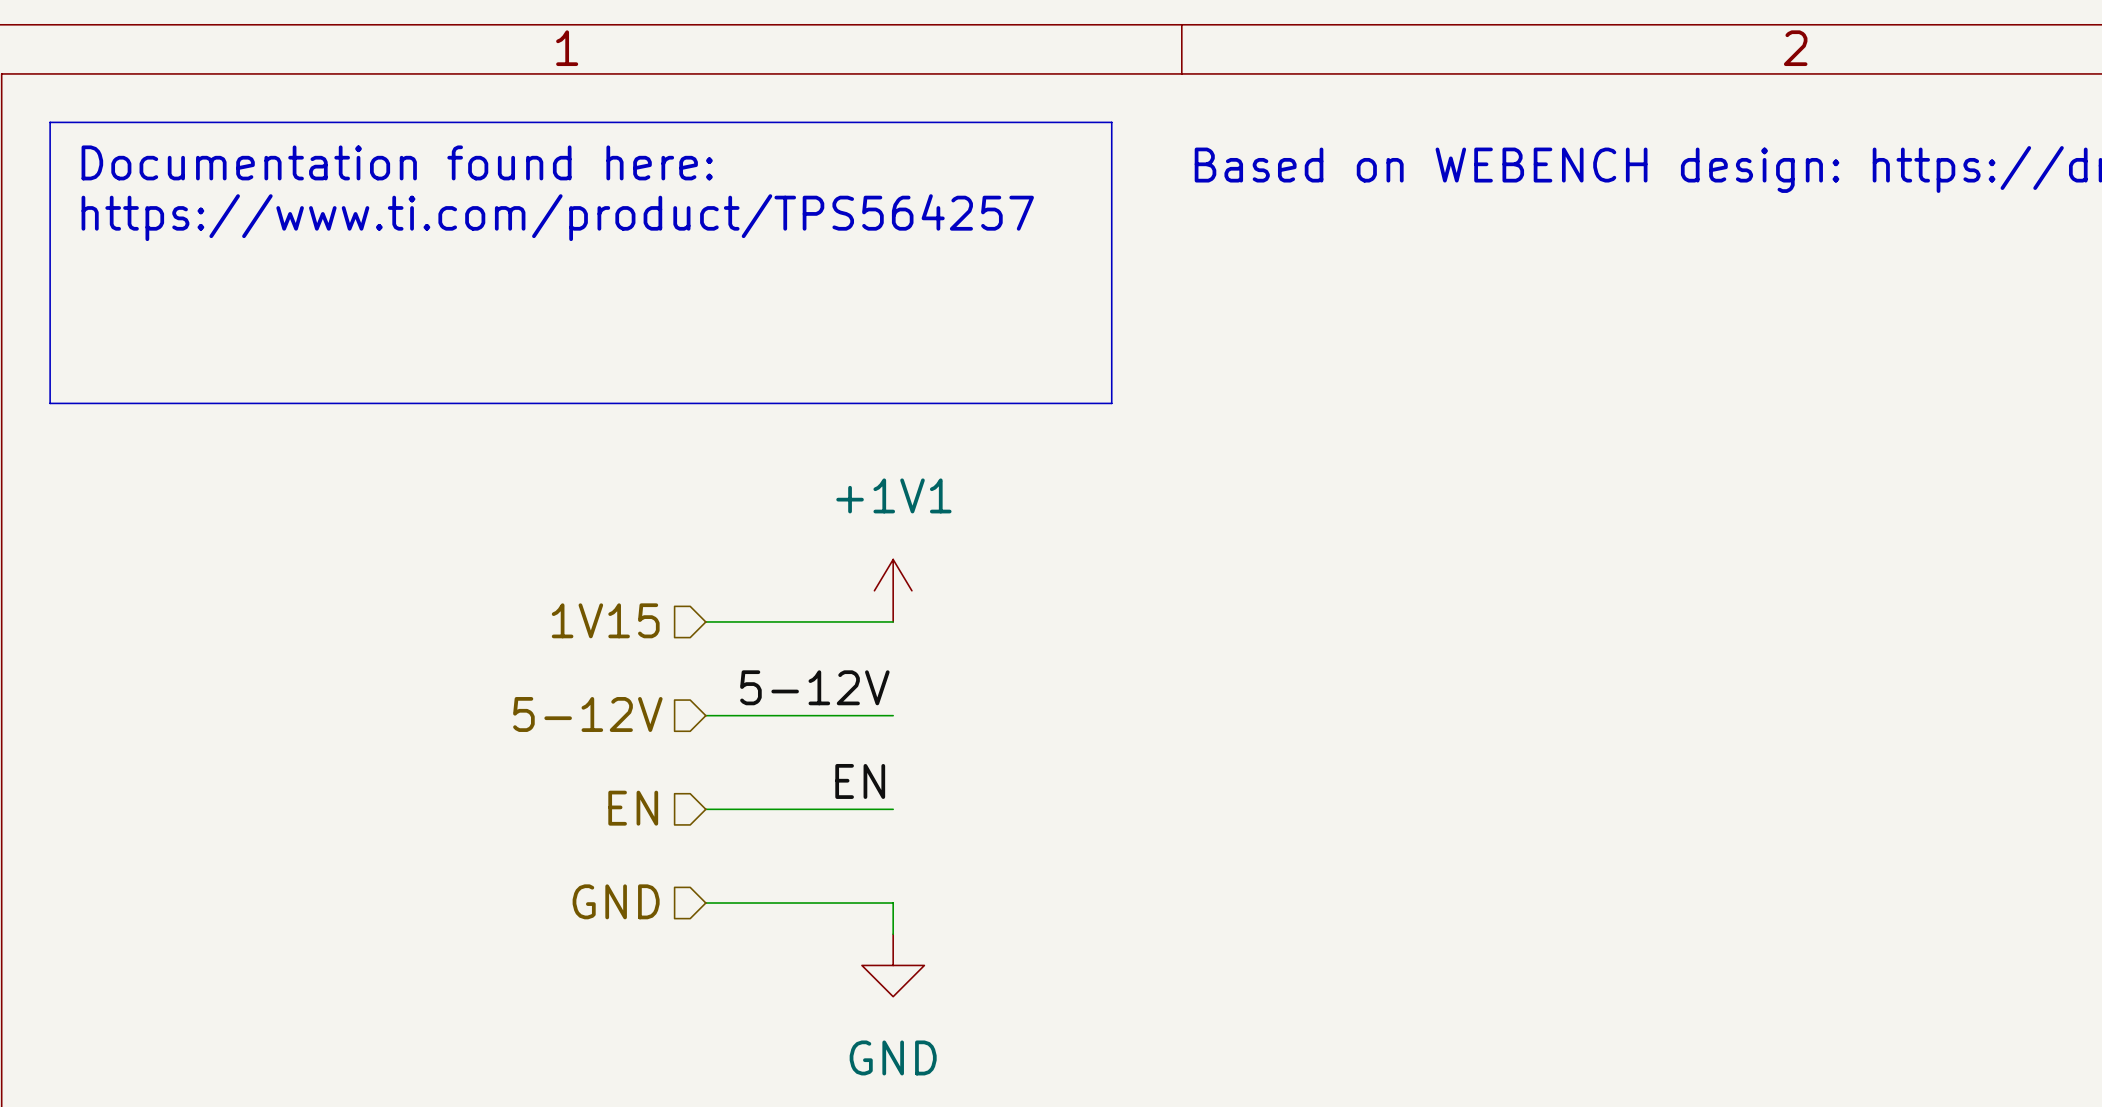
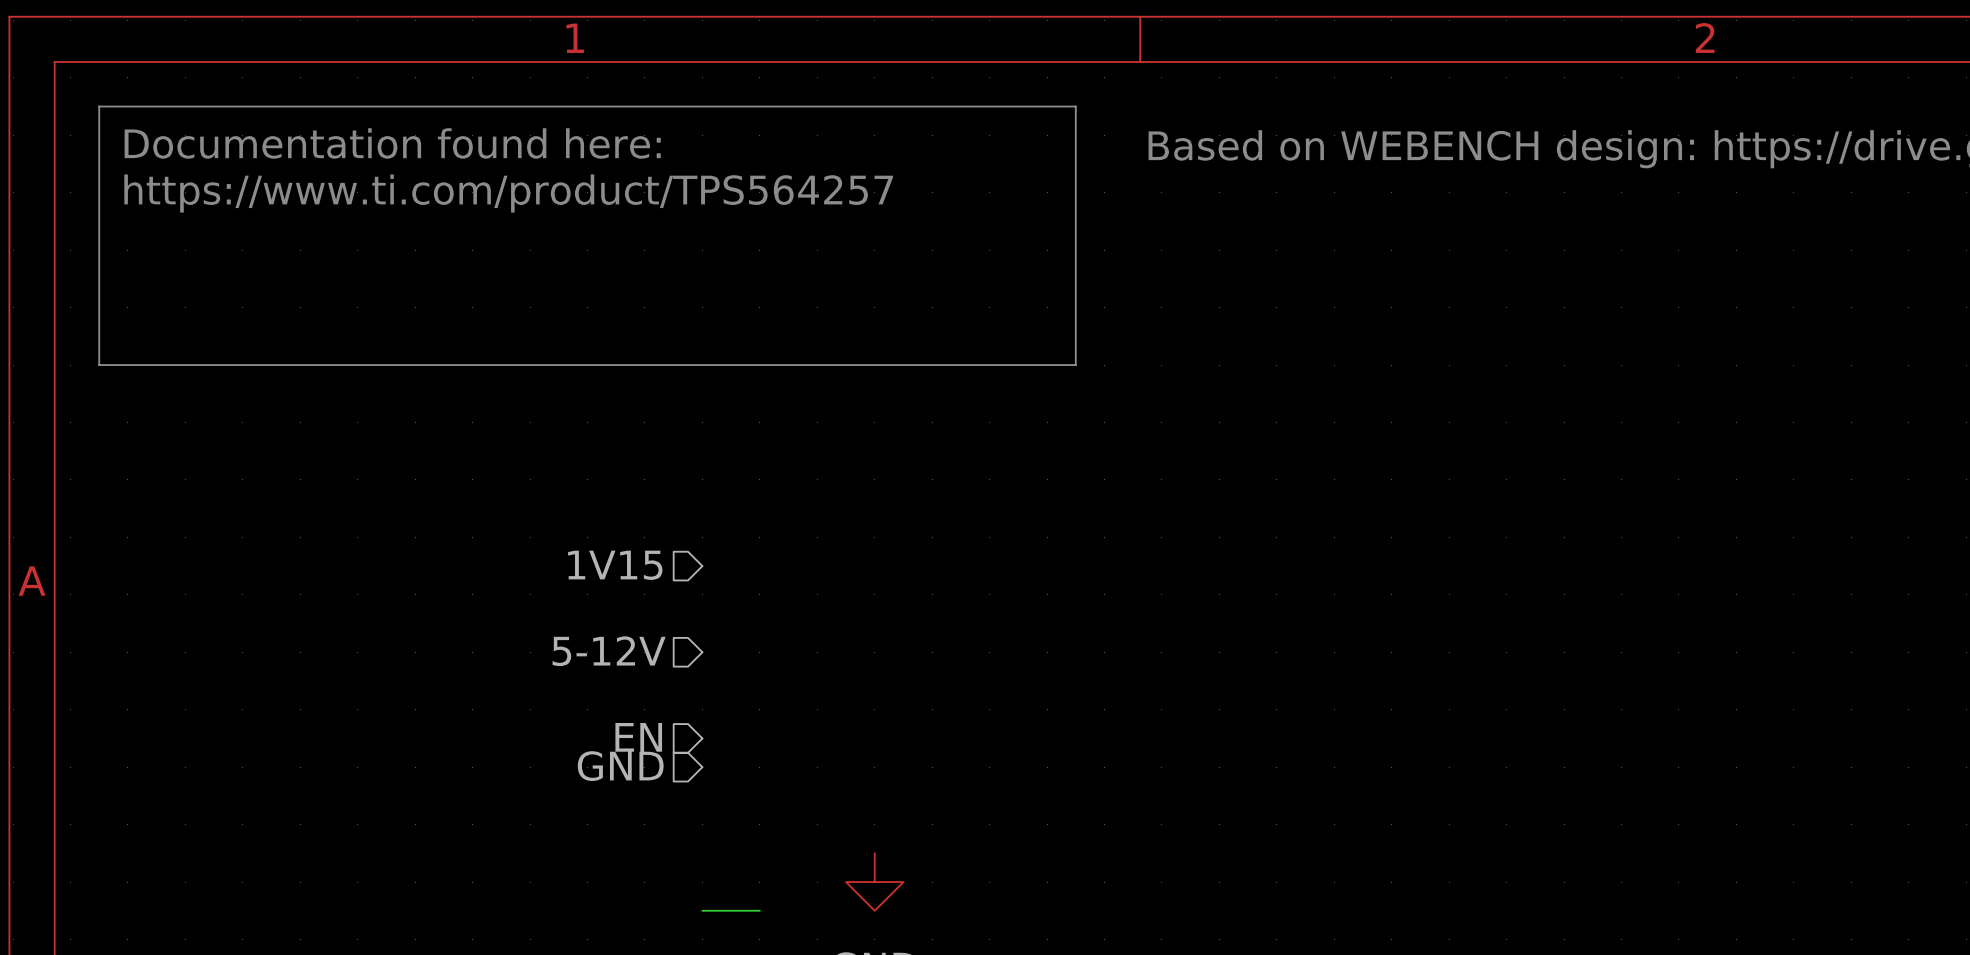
power symbol: +1V1 (893, 590) -> none
wire: (705, 621) (893, 621) -> none
label: 5-12V (814, 687) -> none
wire: (705, 715) (893, 715) -> none
label: EN (860, 781) -> none
wire: (705, 809) (893, 809) -> none
hierarchical label position: GND (616, 901) -> GND (620, 766)
wire: (705, 903) (893, 903) (893, 934) -> none
wire: none -> (702, 910) (759, 910)

